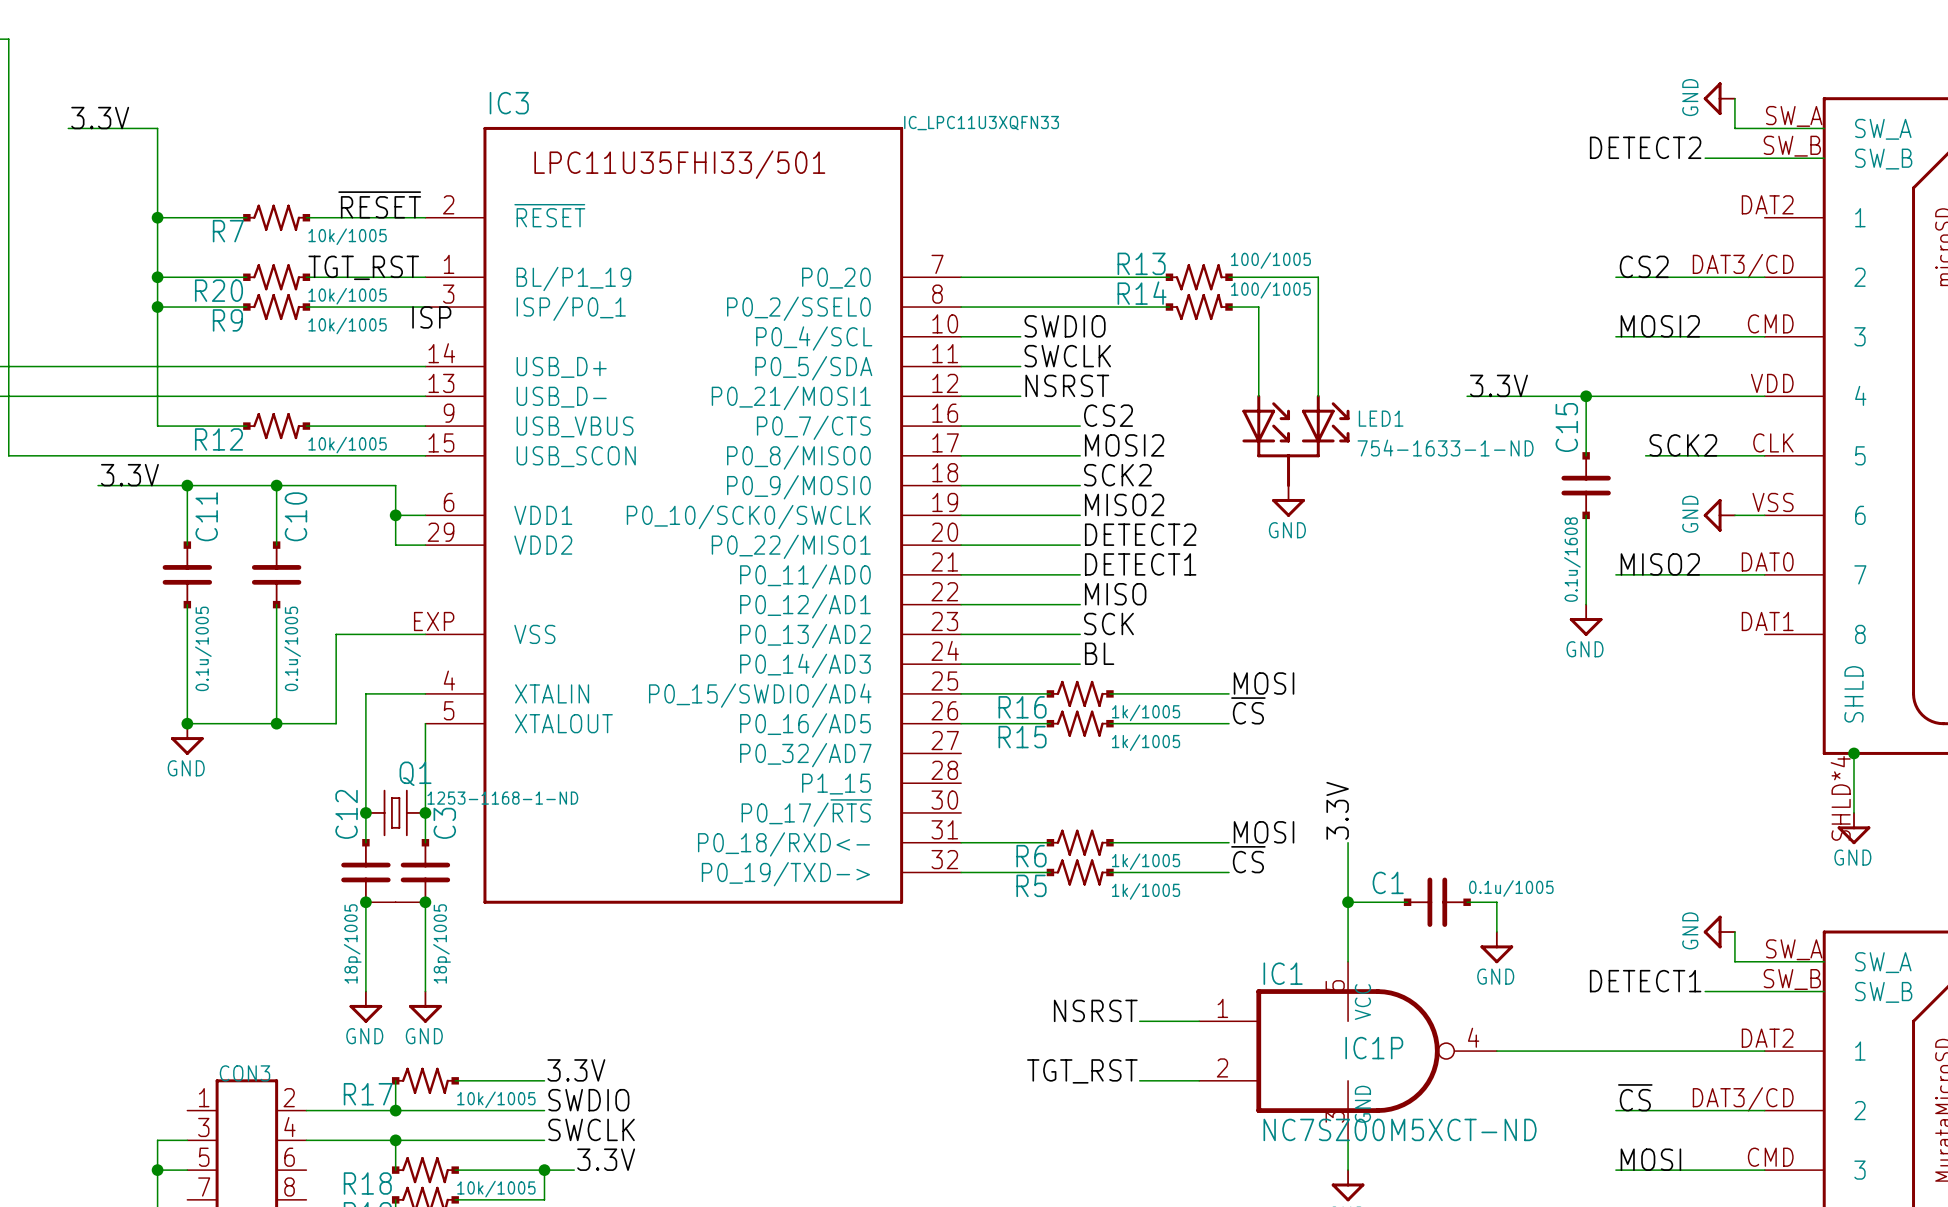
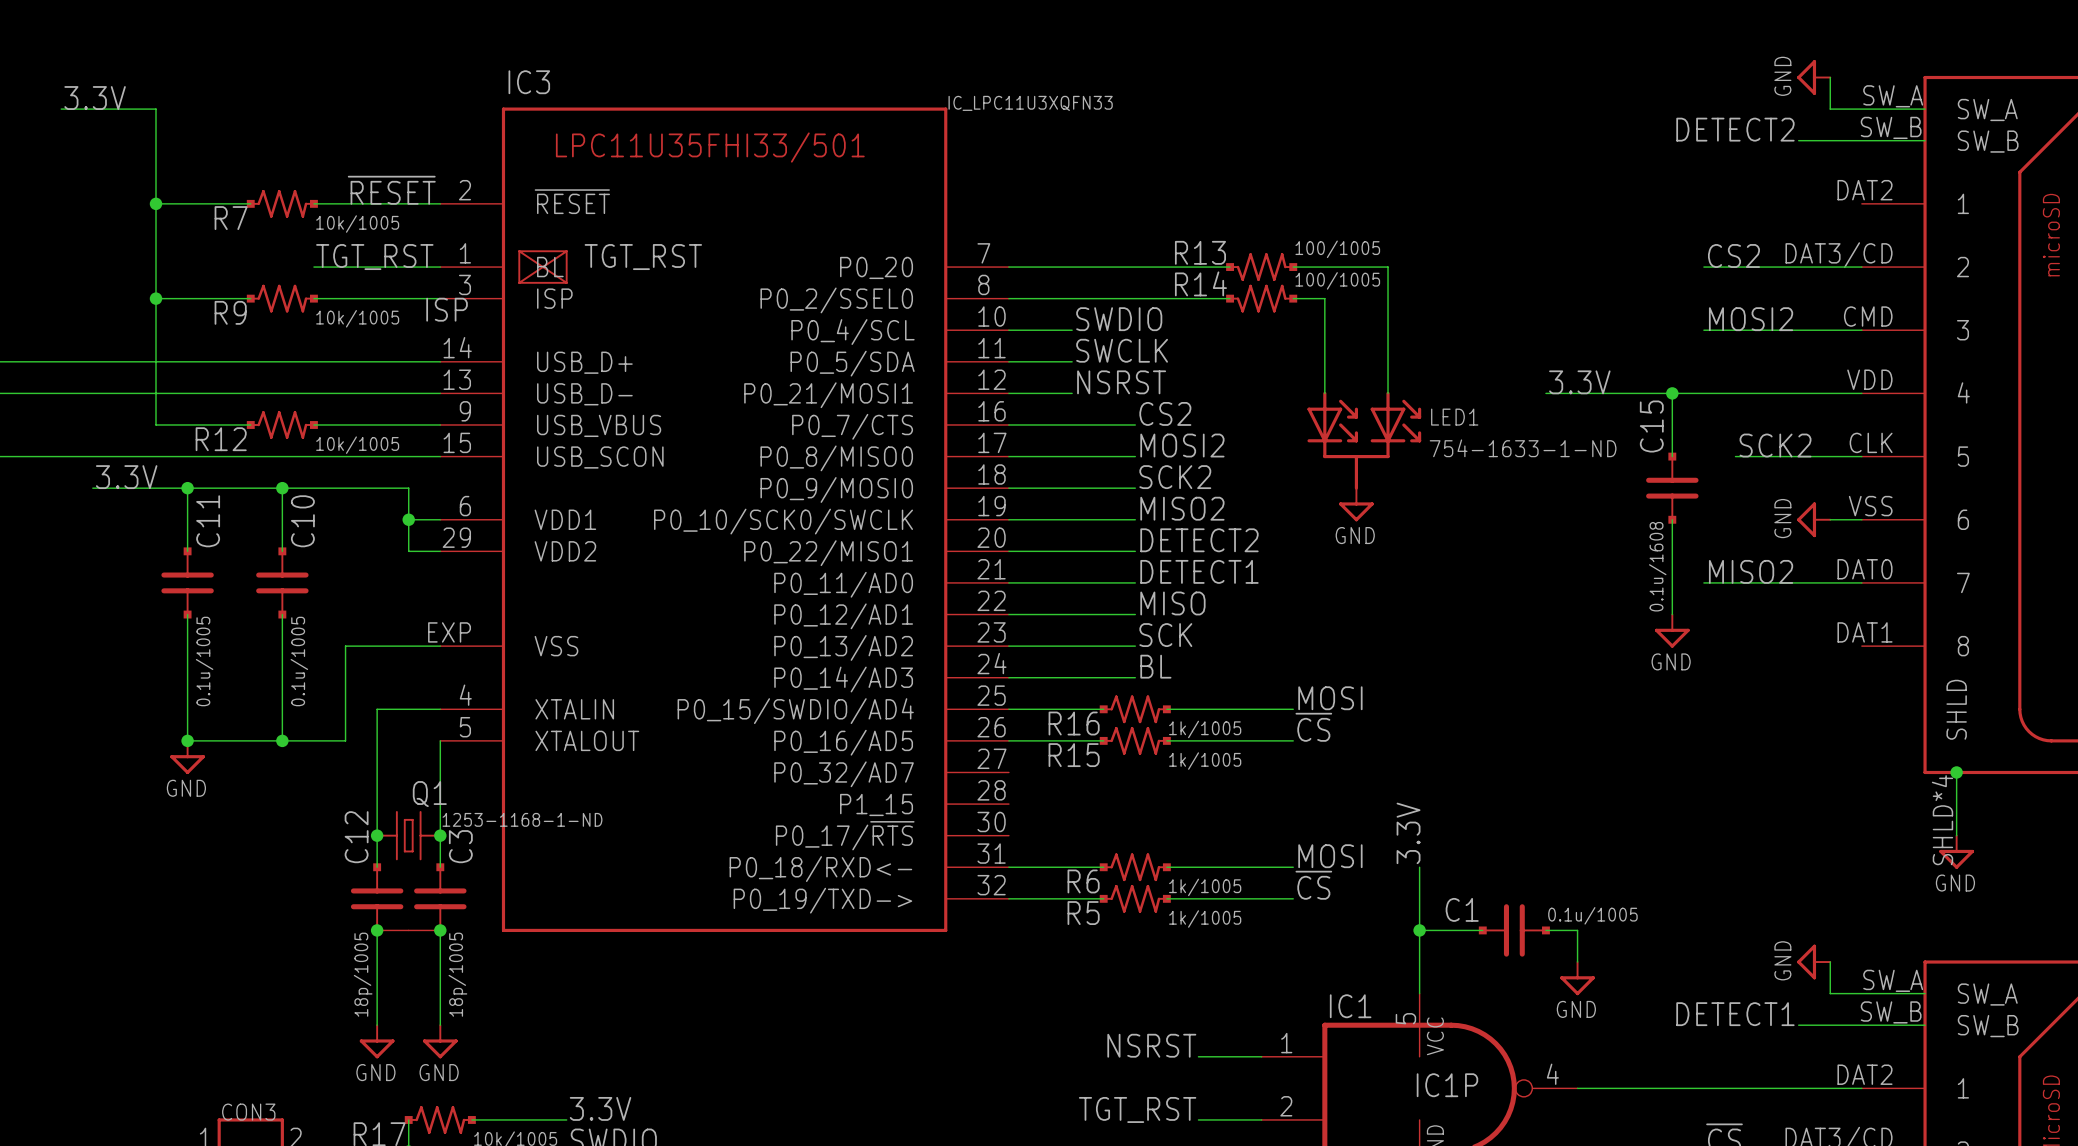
line: none -> (519, 251) (566, 251)
line: none -> (519, 251) (519, 282)
line: none -> (519, 251) (566, 282)
line: none -> (566, 251) (566, 282)
line: none -> (566, 251) (519, 282)
label: none -> TGT_RST (643, 257)
wire: (157, 277) (246, 277) -> none
junction: (157, 277) -> none
R20: 10k/1005 (276, 277) -> none
IC3 pin name: BL/P1_19 (573, 278) -> BL (550, 267)
line: none -> (519, 282) (566, 282)
IC3 pin name: ISP/P0_1 (571, 308) -> ISP (554, 298)

